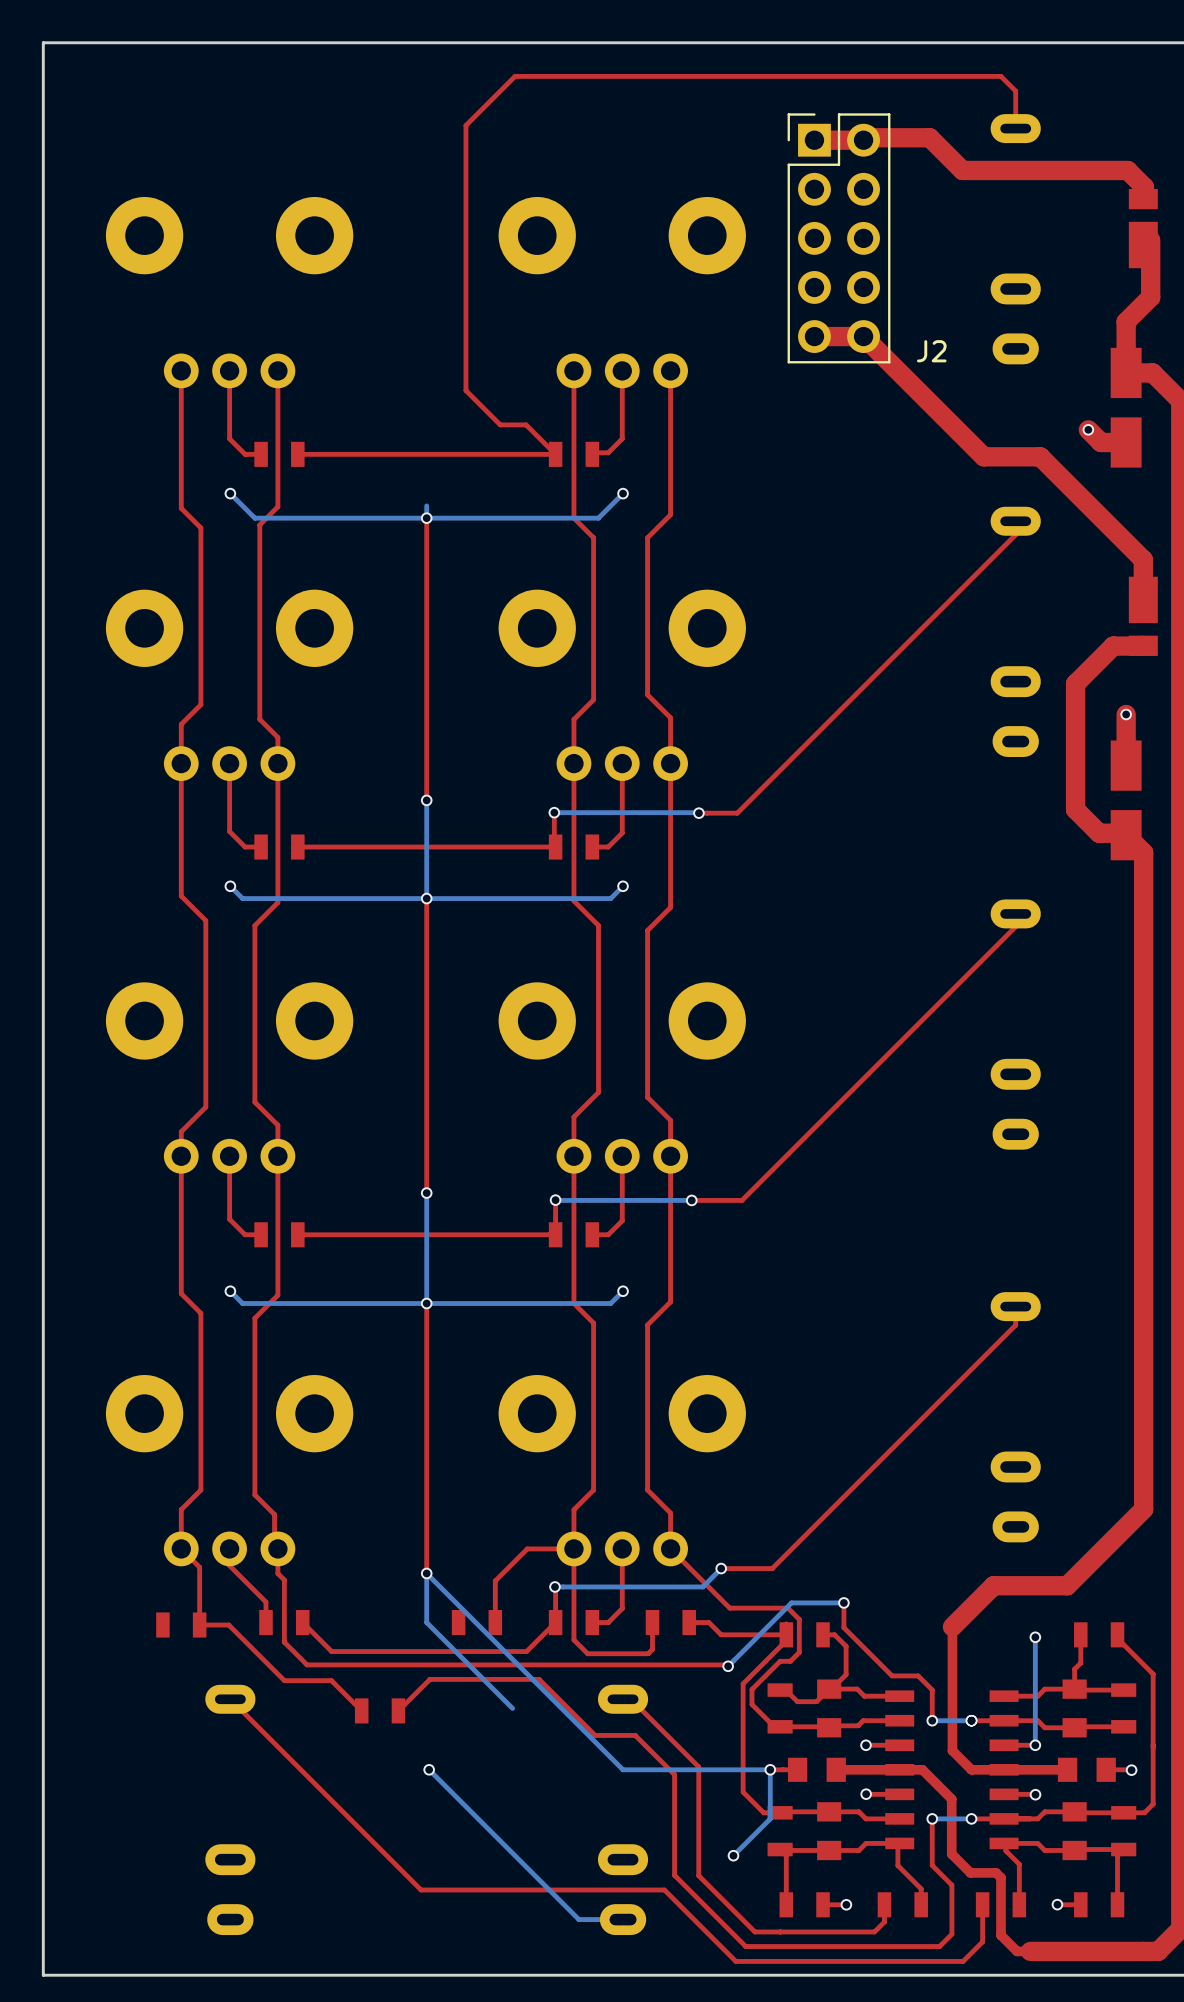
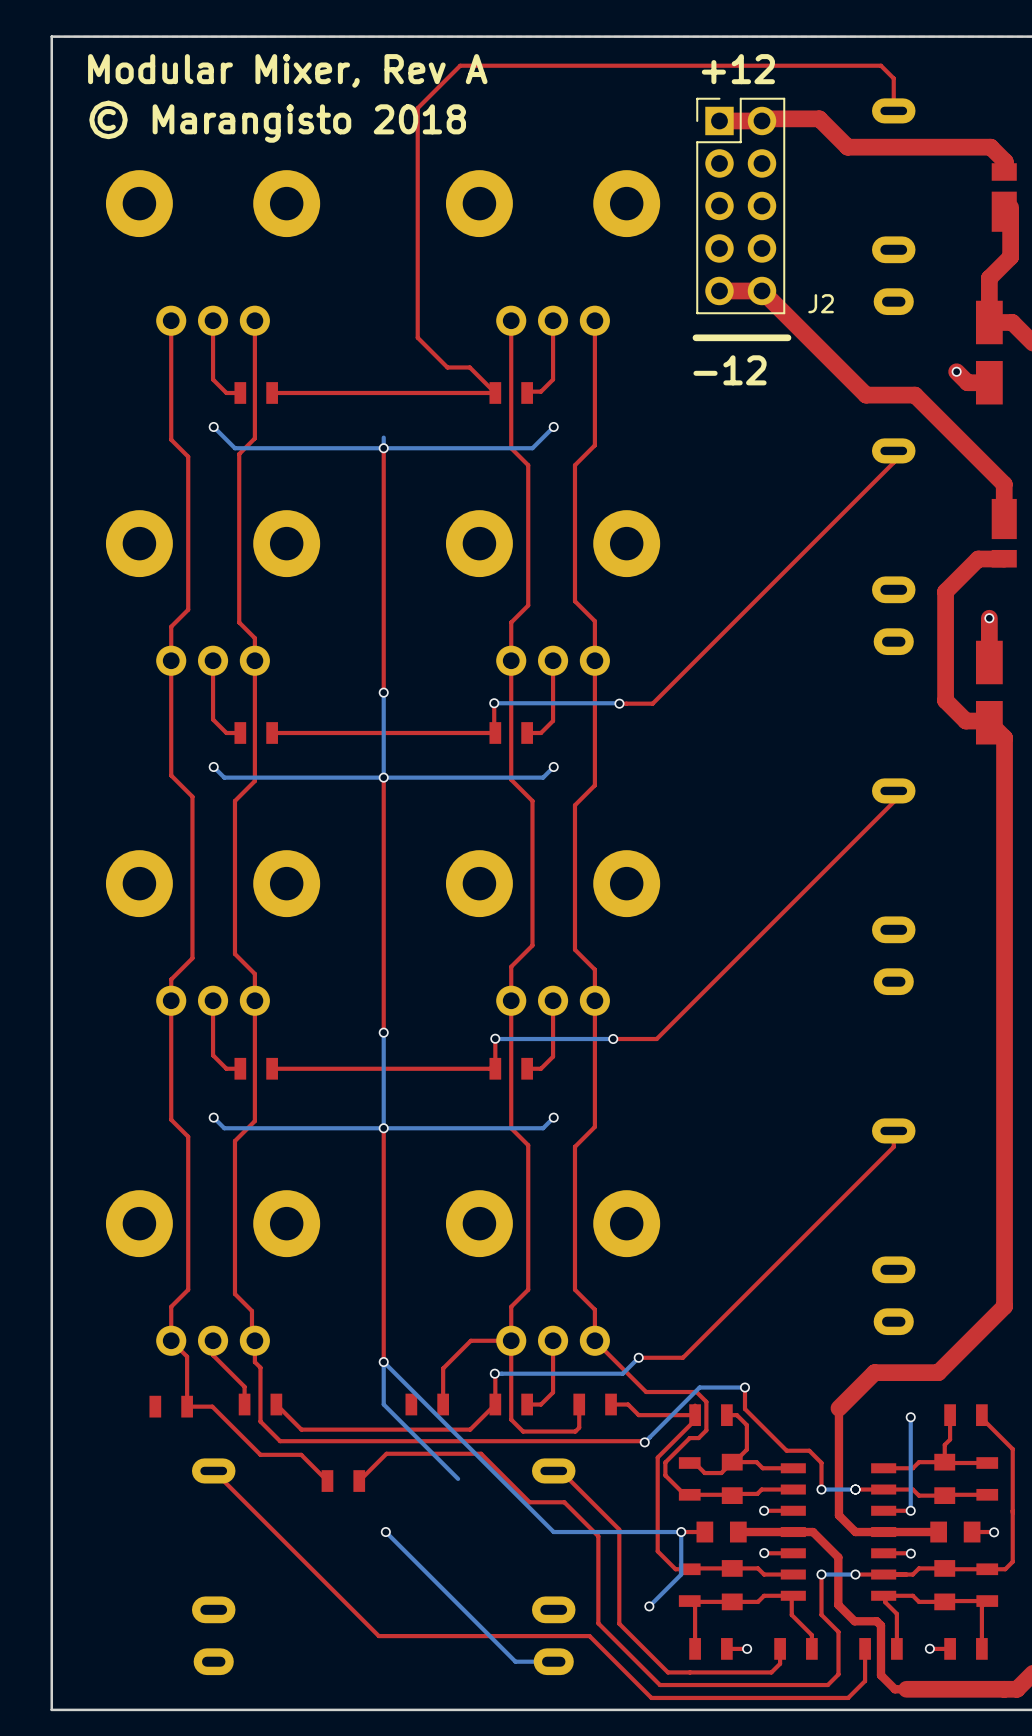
text: none -> +12 (738, 69)
text: none -> Modular Mixer, Rev A (287, 70)
text: none -> © Marangisto 2018 (277, 121)
line: none -> (787, 337) (695, 337)
text: none -> -12 (730, 370)

